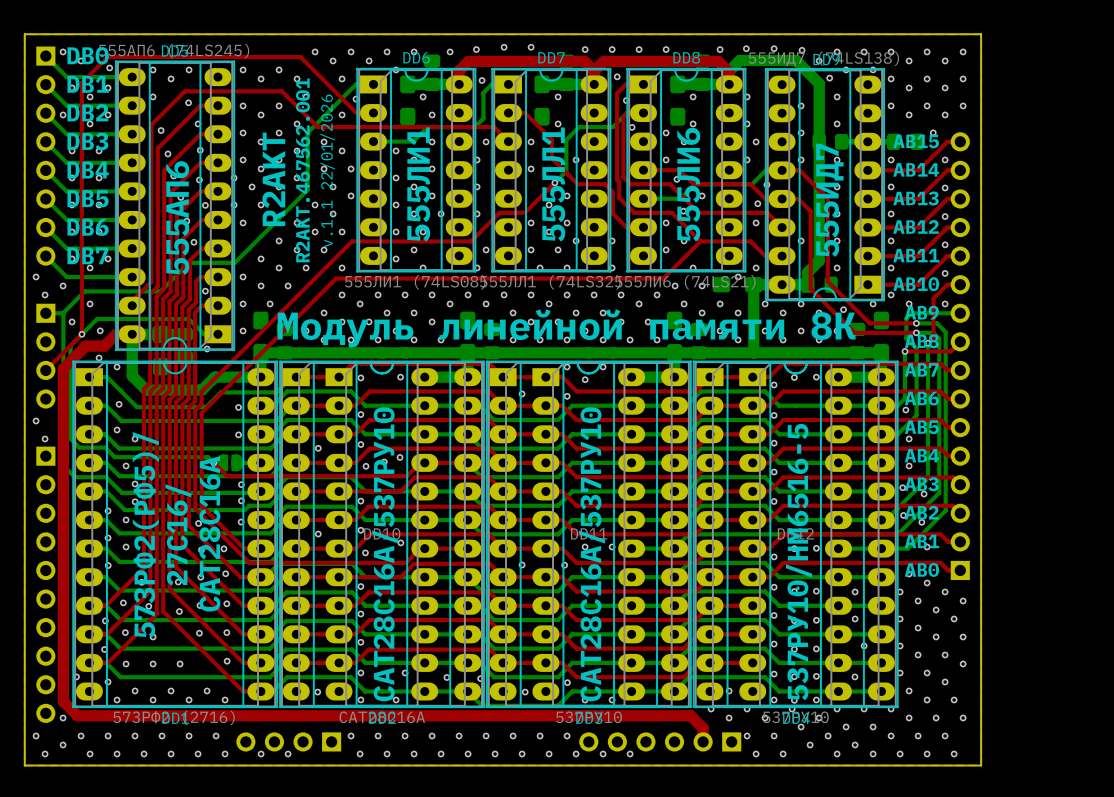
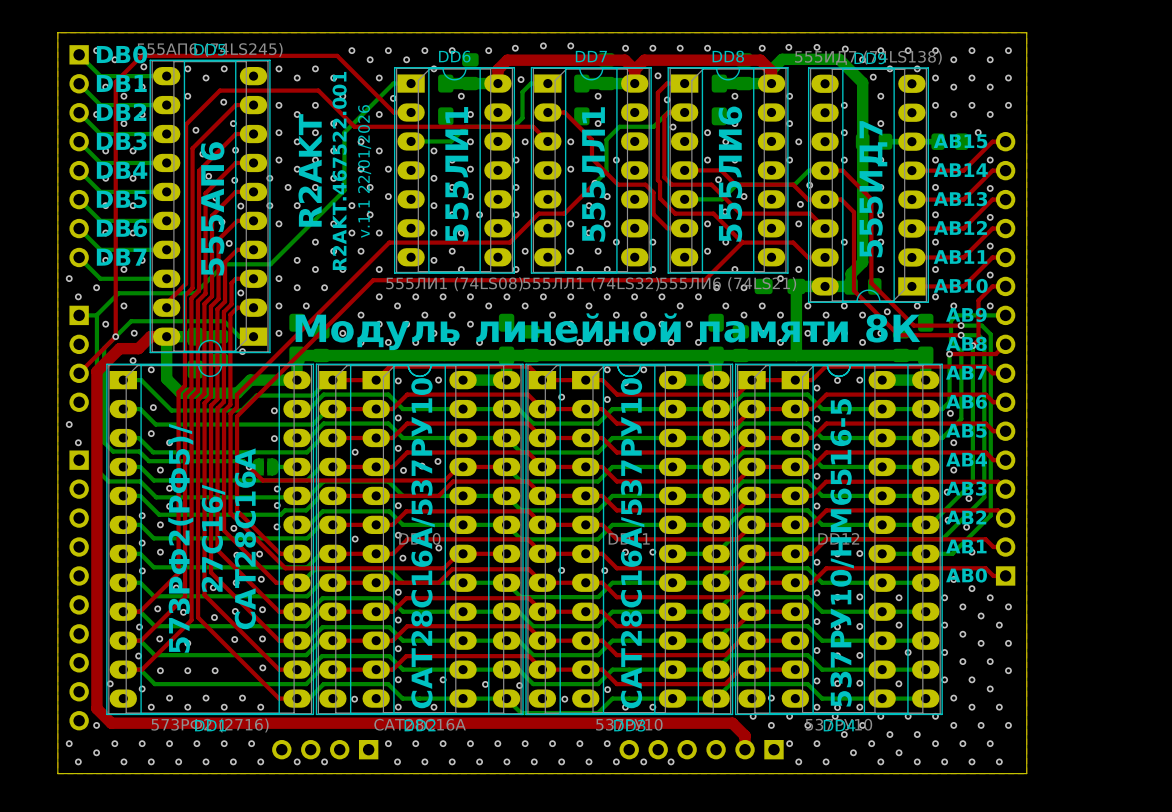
text: R2AKT.467562.001 (302, 170) -> R2AKT.467522.001 (339, 170)

